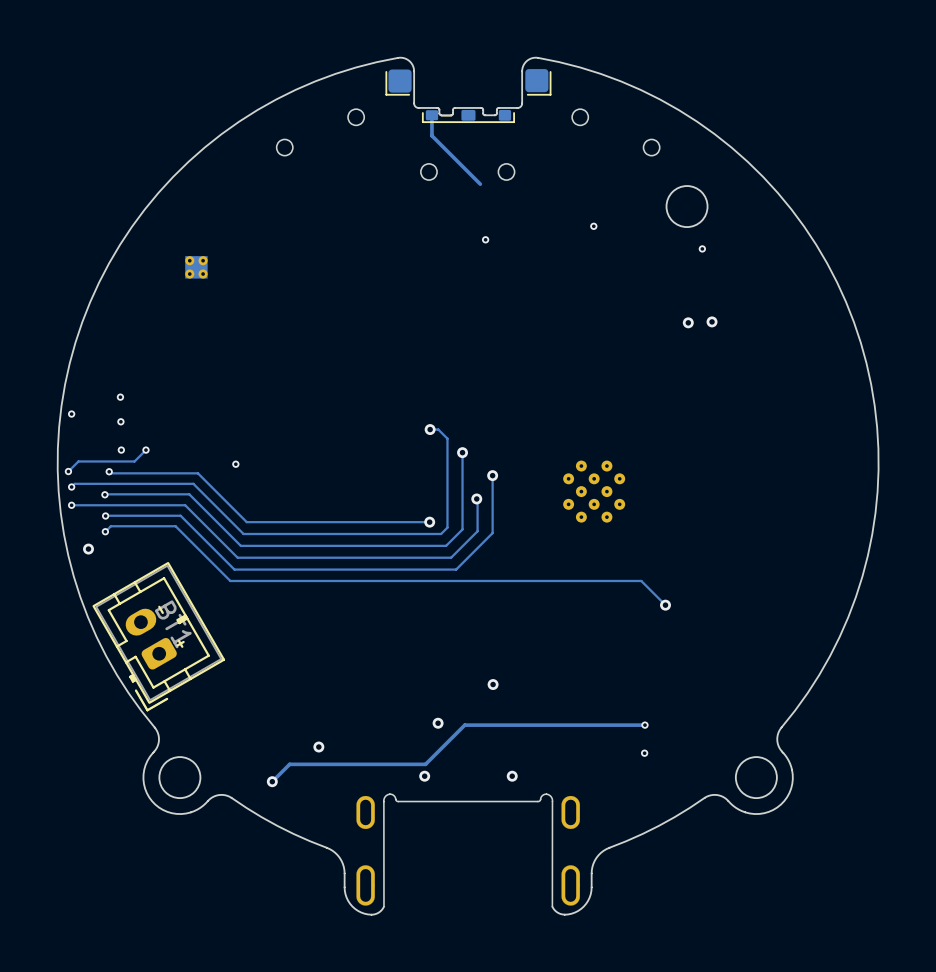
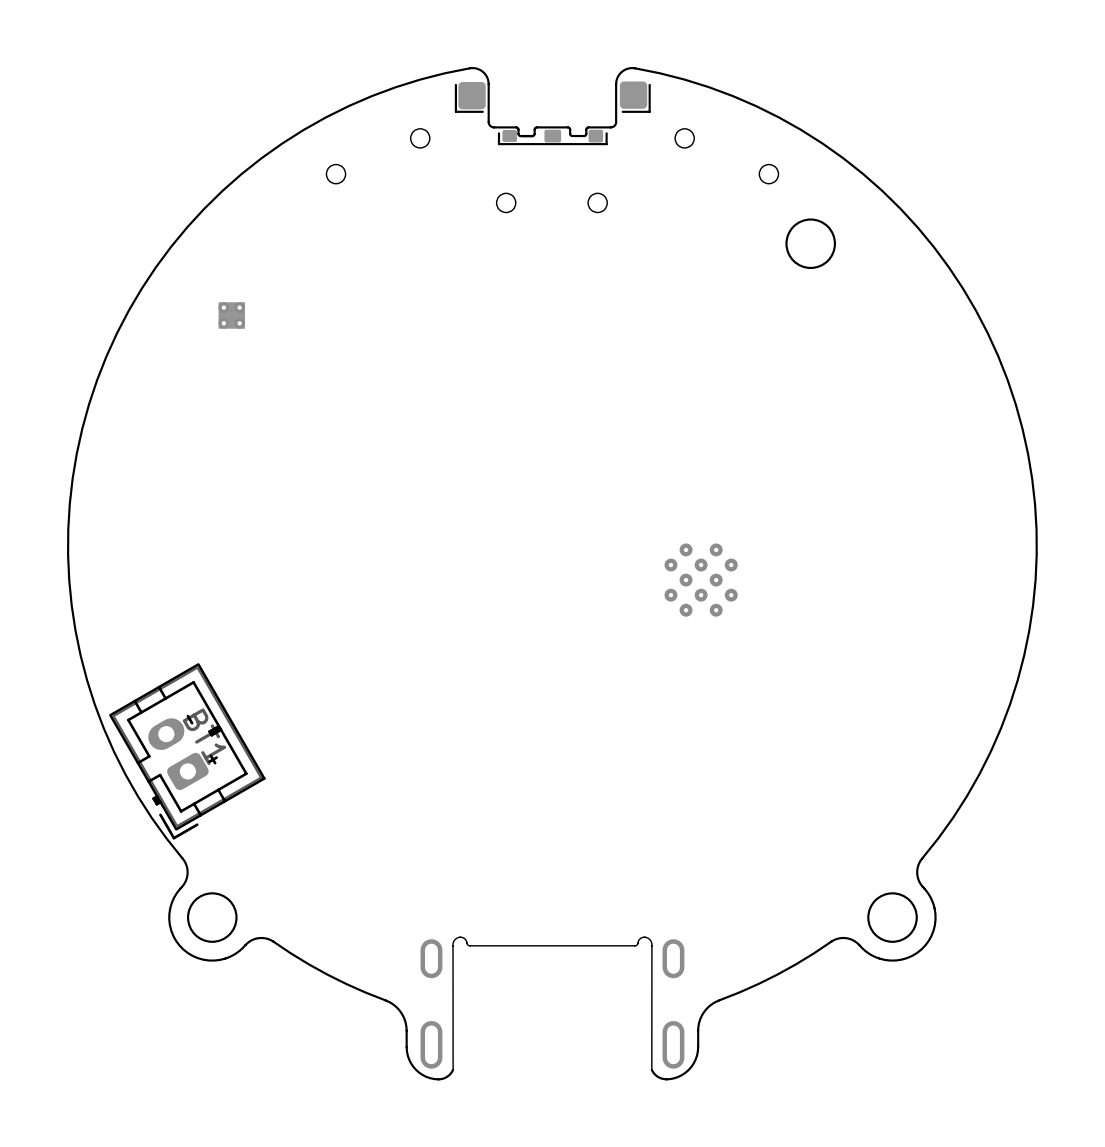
track: (431, 115) (431, 135) (480, 184) -> none
via: (593, 226) -> none
via: (485, 239) -> none
via: (702, 248) -> none
via: (712, 321) -> none
via: (688, 322) -> none
via: (120, 397) -> none
via: (71, 414) -> none
via: (120, 421) -> none
track: (430, 429) (438, 429) (447, 438) (447, 527) (441, 534) (243, 534) (193, 483) (74, 483) (71, 487) -> none
via: (430, 429) -> none
via: (121, 450) -> none
track: (145, 450) (134, 461) (78, 461) (68, 471) -> none
via: (145, 450) -> none
track: (462, 452) (462, 529) (446, 545) (240, 545) (189, 494) (104, 494) -> none
via: (462, 452) -> none
via: (235, 464) -> none
via: (68, 471) -> none
track: (109, 471) (110, 473) (197, 473) (246, 522) (429, 522) -> none
via: (109, 471) -> none
track: (492, 475) (492, 533) (456, 569) (234, 569) (180, 515) (105, 515) -> none
via: (492, 475) -> none
via: (71, 487) -> none
via: (104, 494) -> none
track: (476, 498) (477, 531) (451, 557) (237, 557) (185, 505) (71, 505) -> none
via: (476, 498) -> none
via: (71, 505) -> none
via: (105, 516) -> none
via: (429, 522) -> none
track: (105, 531) (110, 526) (175, 526) (230, 580) (641, 580) (665, 605) -> none
via: (105, 531) -> none
via: (88, 549) -> none
via: (665, 605) -> none
via: (493, 684) -> none
via: (438, 723) -> none
track: (644, 725) (464, 725) (425, 764) (289, 764) (272, 781) -> none
via: (644, 725) -> none
via: (318, 747) -> none
via: (644, 753) -> none
via: (424, 776) -> none
via: (512, 776) -> none
via: (272, 781) -> none

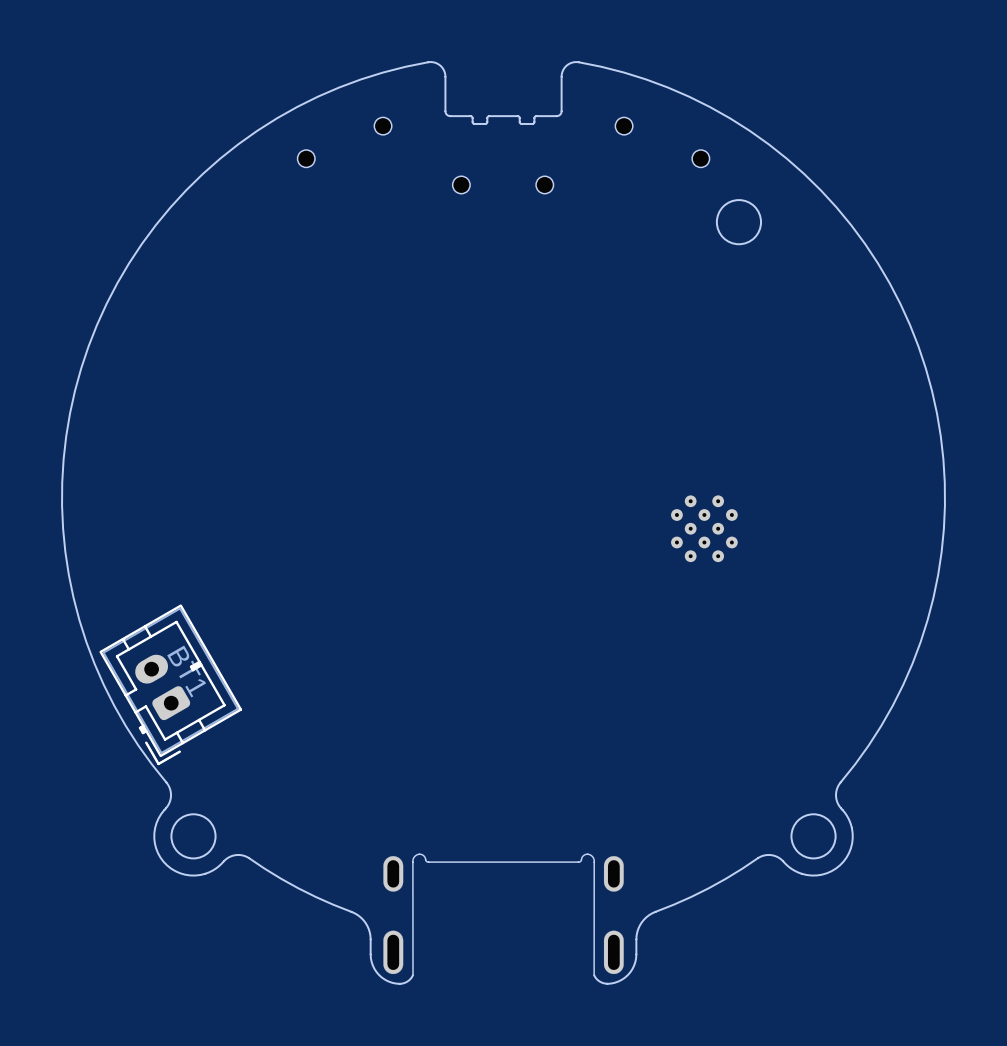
part: (552, 113) -> none
part: (231, 315) -> none
part position: (701, 580) -> (704, 528)
text: - + (202, 739) -> none

